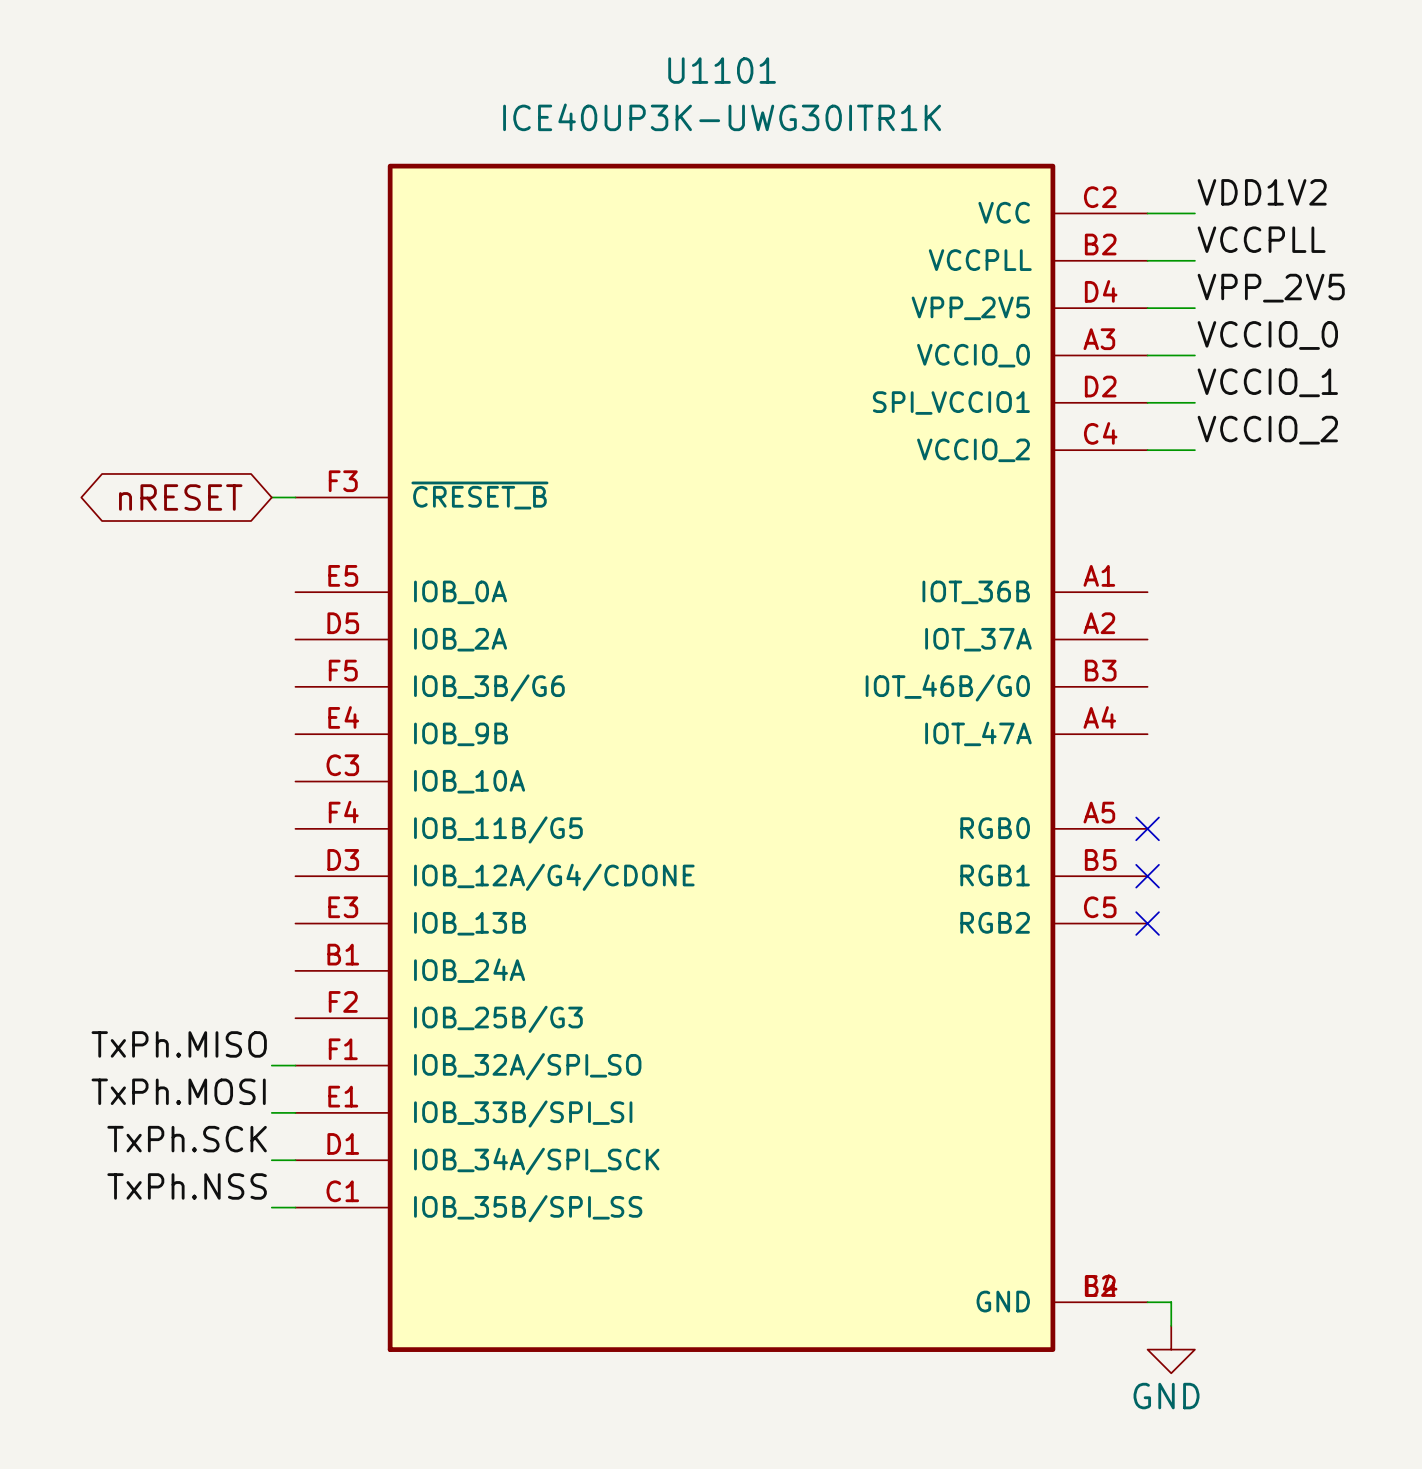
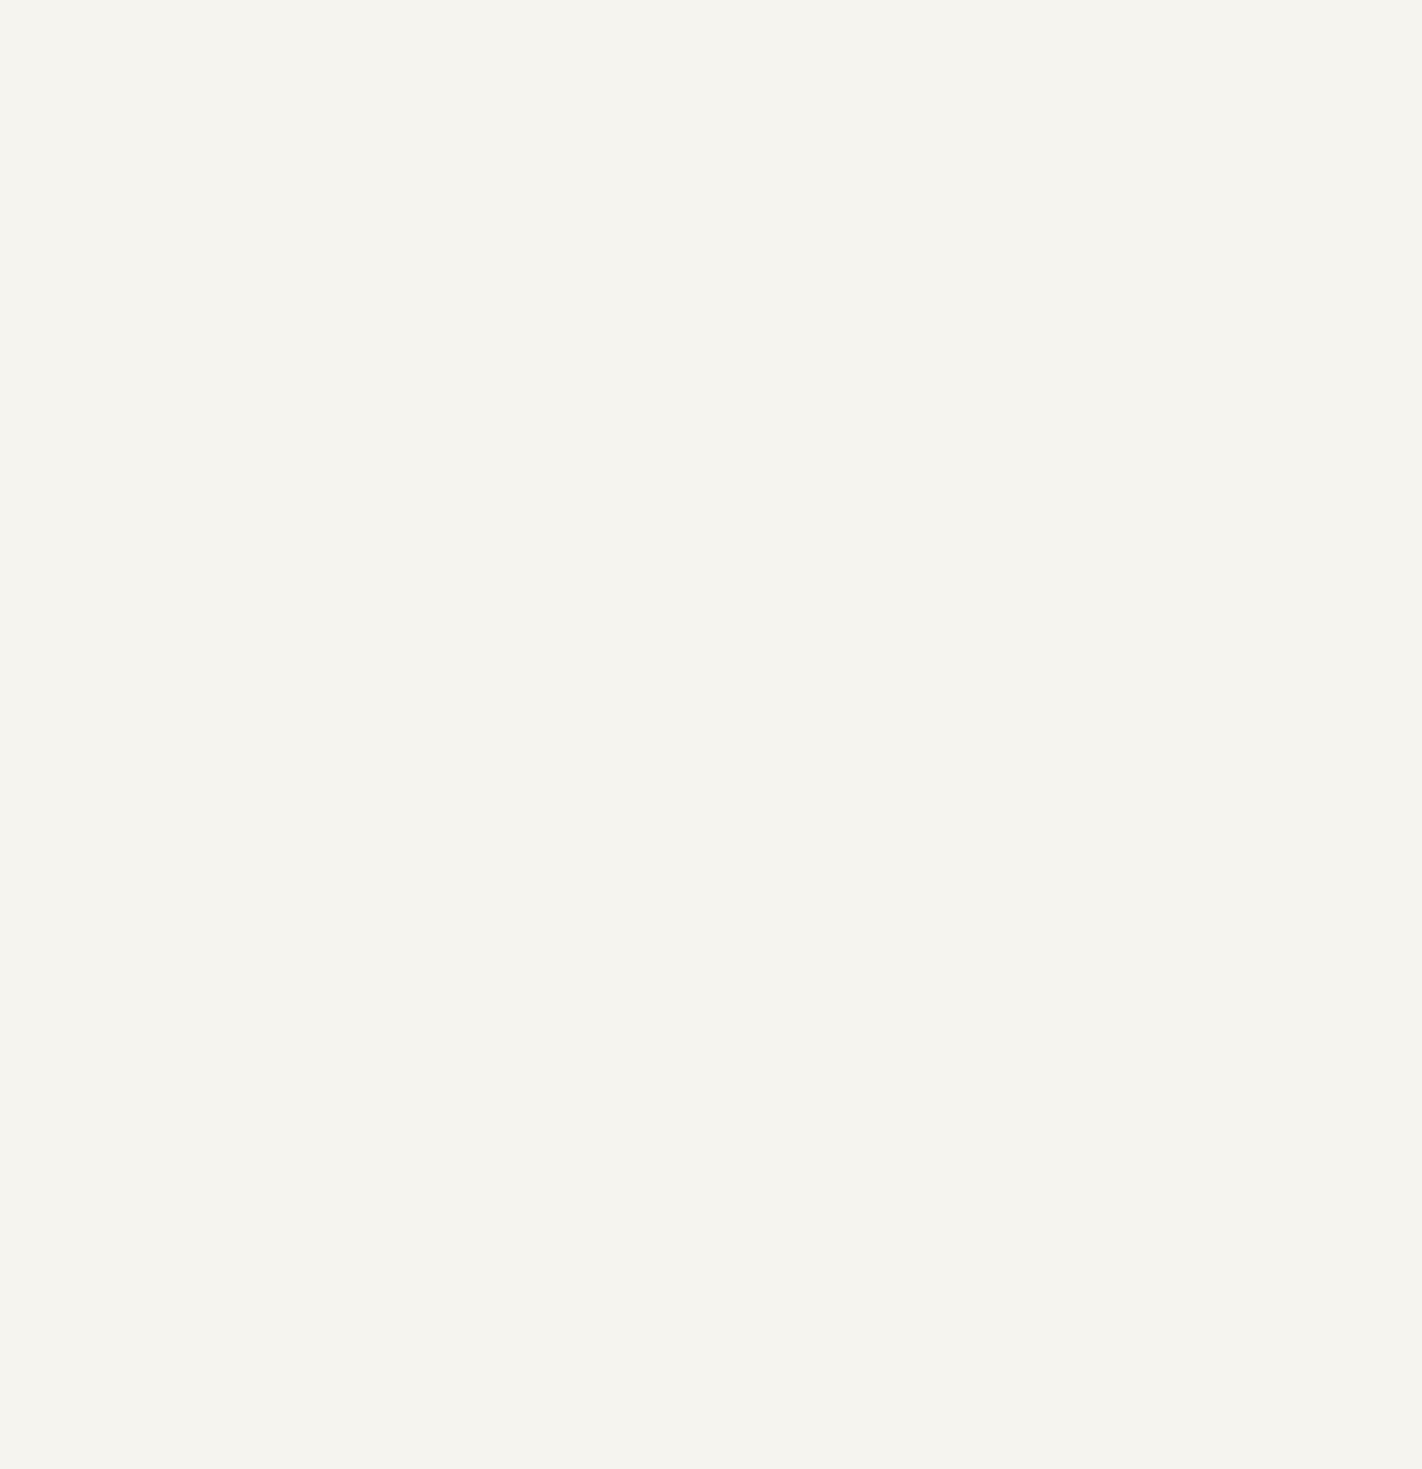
label: VDD1V2 (1262, 192) -> none
wire: (1147, 213) (1194, 213) -> none
label: VCCPLL (1261, 239) -> none
wire: (1147, 260) (1194, 260) -> none
label: VPP_2V5 (1271, 288) -> none
wire: (1147, 308) (1194, 308) -> none
label: VCCIO_0 (1267, 335) -> none
wire: (1147, 355) (1194, 355) -> none
label: VCCIO_1 (1267, 382) -> none
wire: (1147, 402) (1194, 402) -> none
label: VCCIO_2 (1267, 430) -> none
wire: (1147, 450) (1194, 450) -> none
global label: nRESET (180, 497) -> none
wire: (271, 497) (295, 497) -> none
U1101: ICE40UP3K-UWG30ITR1K (721, 757) -> none
no-connect mark: (1147, 828) -> none
no-connect mark: (1147, 876) -> none
no-connect mark: (1147, 923) -> none
label: TxPh.MISO (179, 1044) -> none
wire: (271, 1065) (295, 1065) -> none
label: TxPh.MOSI (178, 1091) -> none
wire: (271, 1112) (295, 1112) -> none
label: TxPh.SCK (187, 1139) -> none
wire: (271, 1160) (295, 1160) -> none
label: TxPh.NSS (187, 1186) -> none
wire: (271, 1207) (295, 1207) -> none
wire: (1147, 1302) (1171, 1302) (1171, 1325) -> none
power symbol: GND (1171, 1349) -> none

